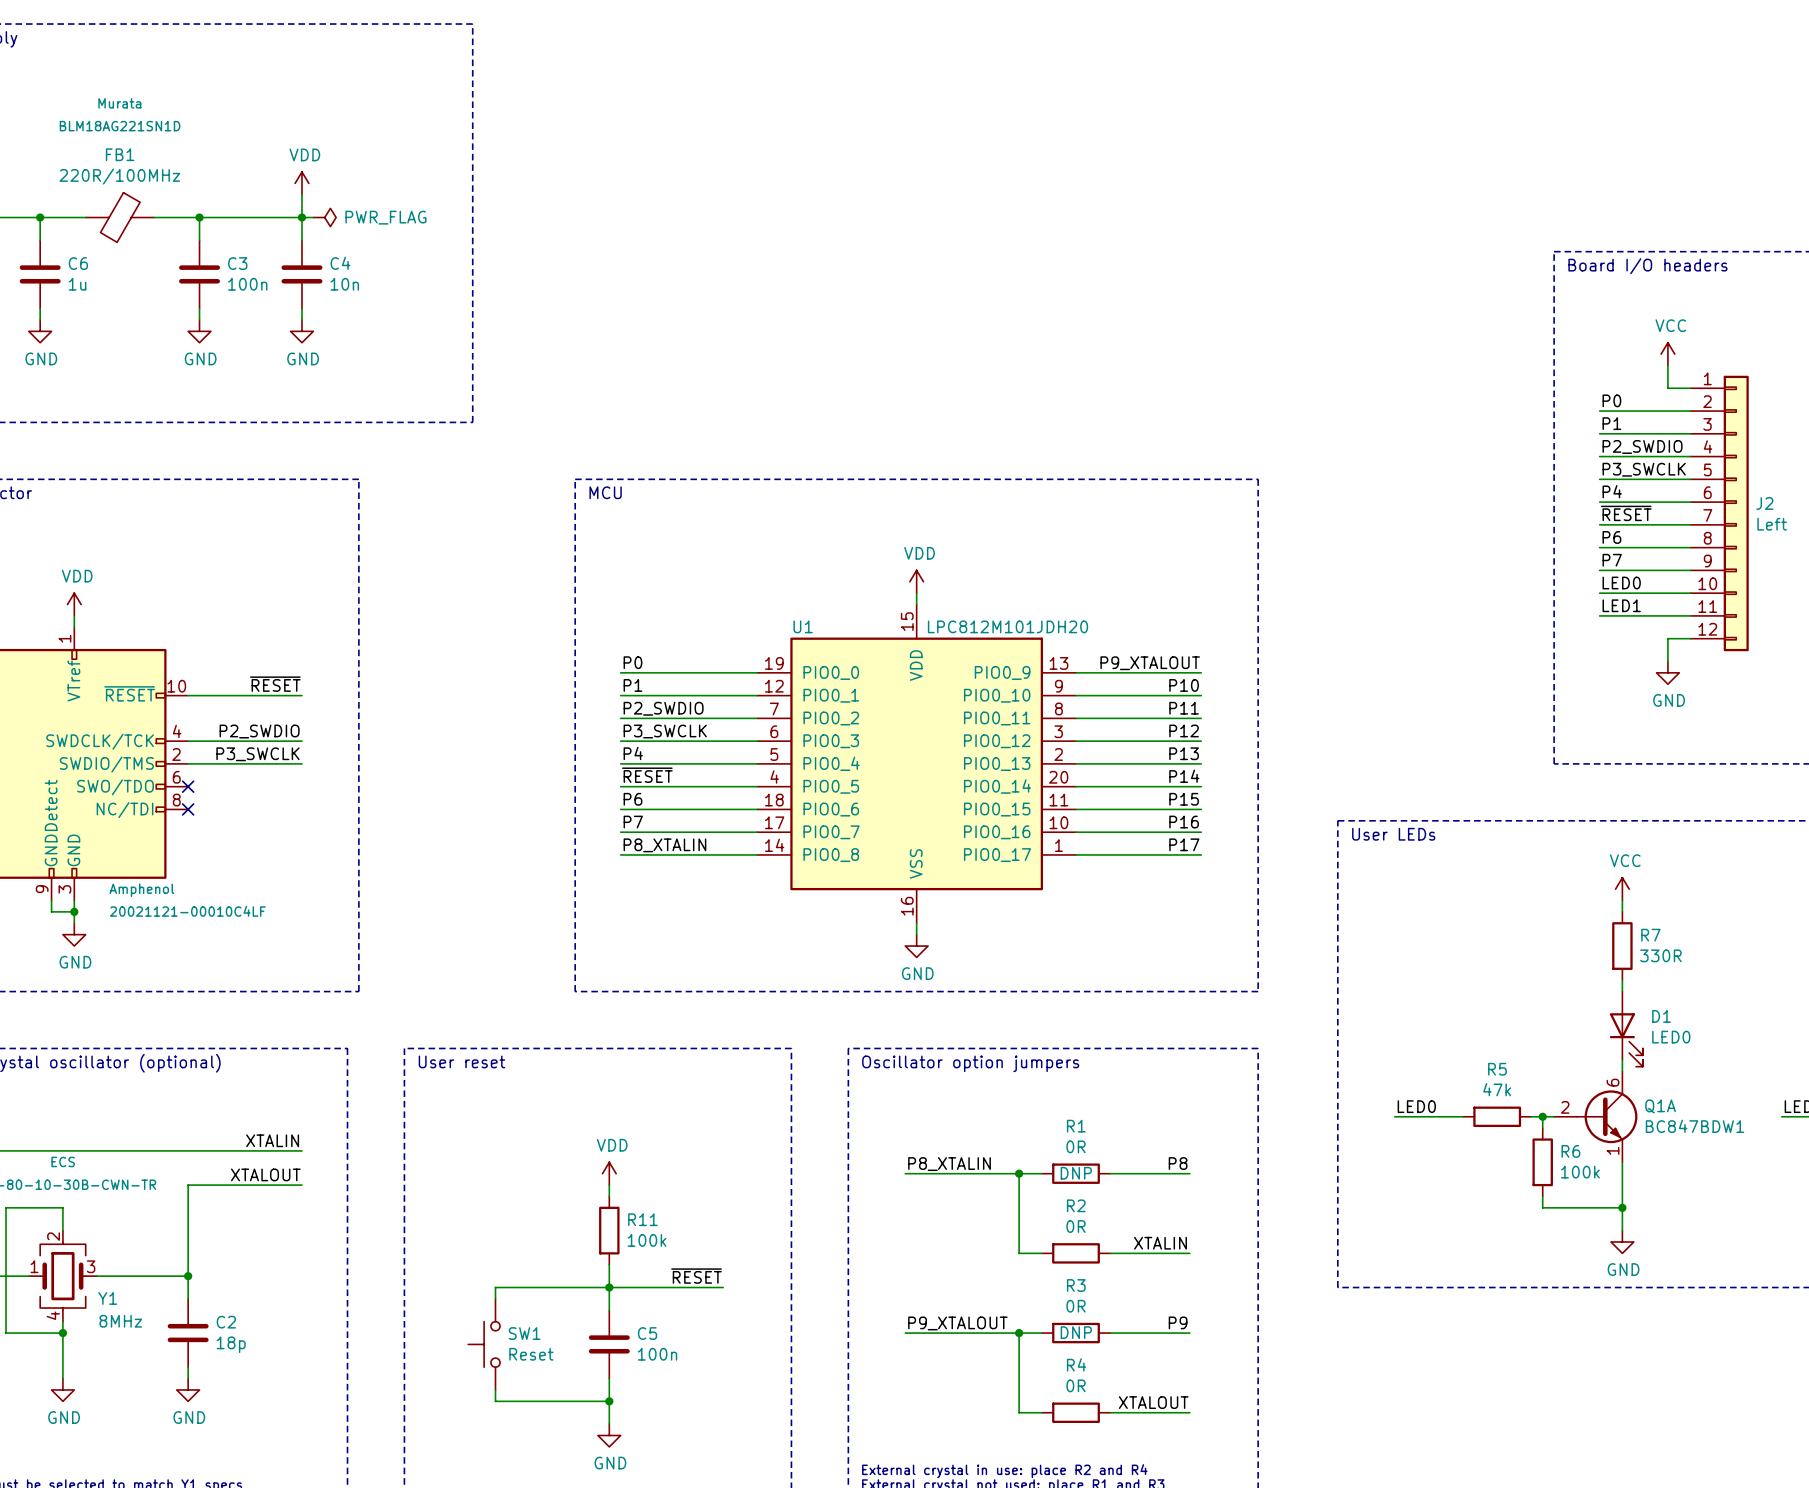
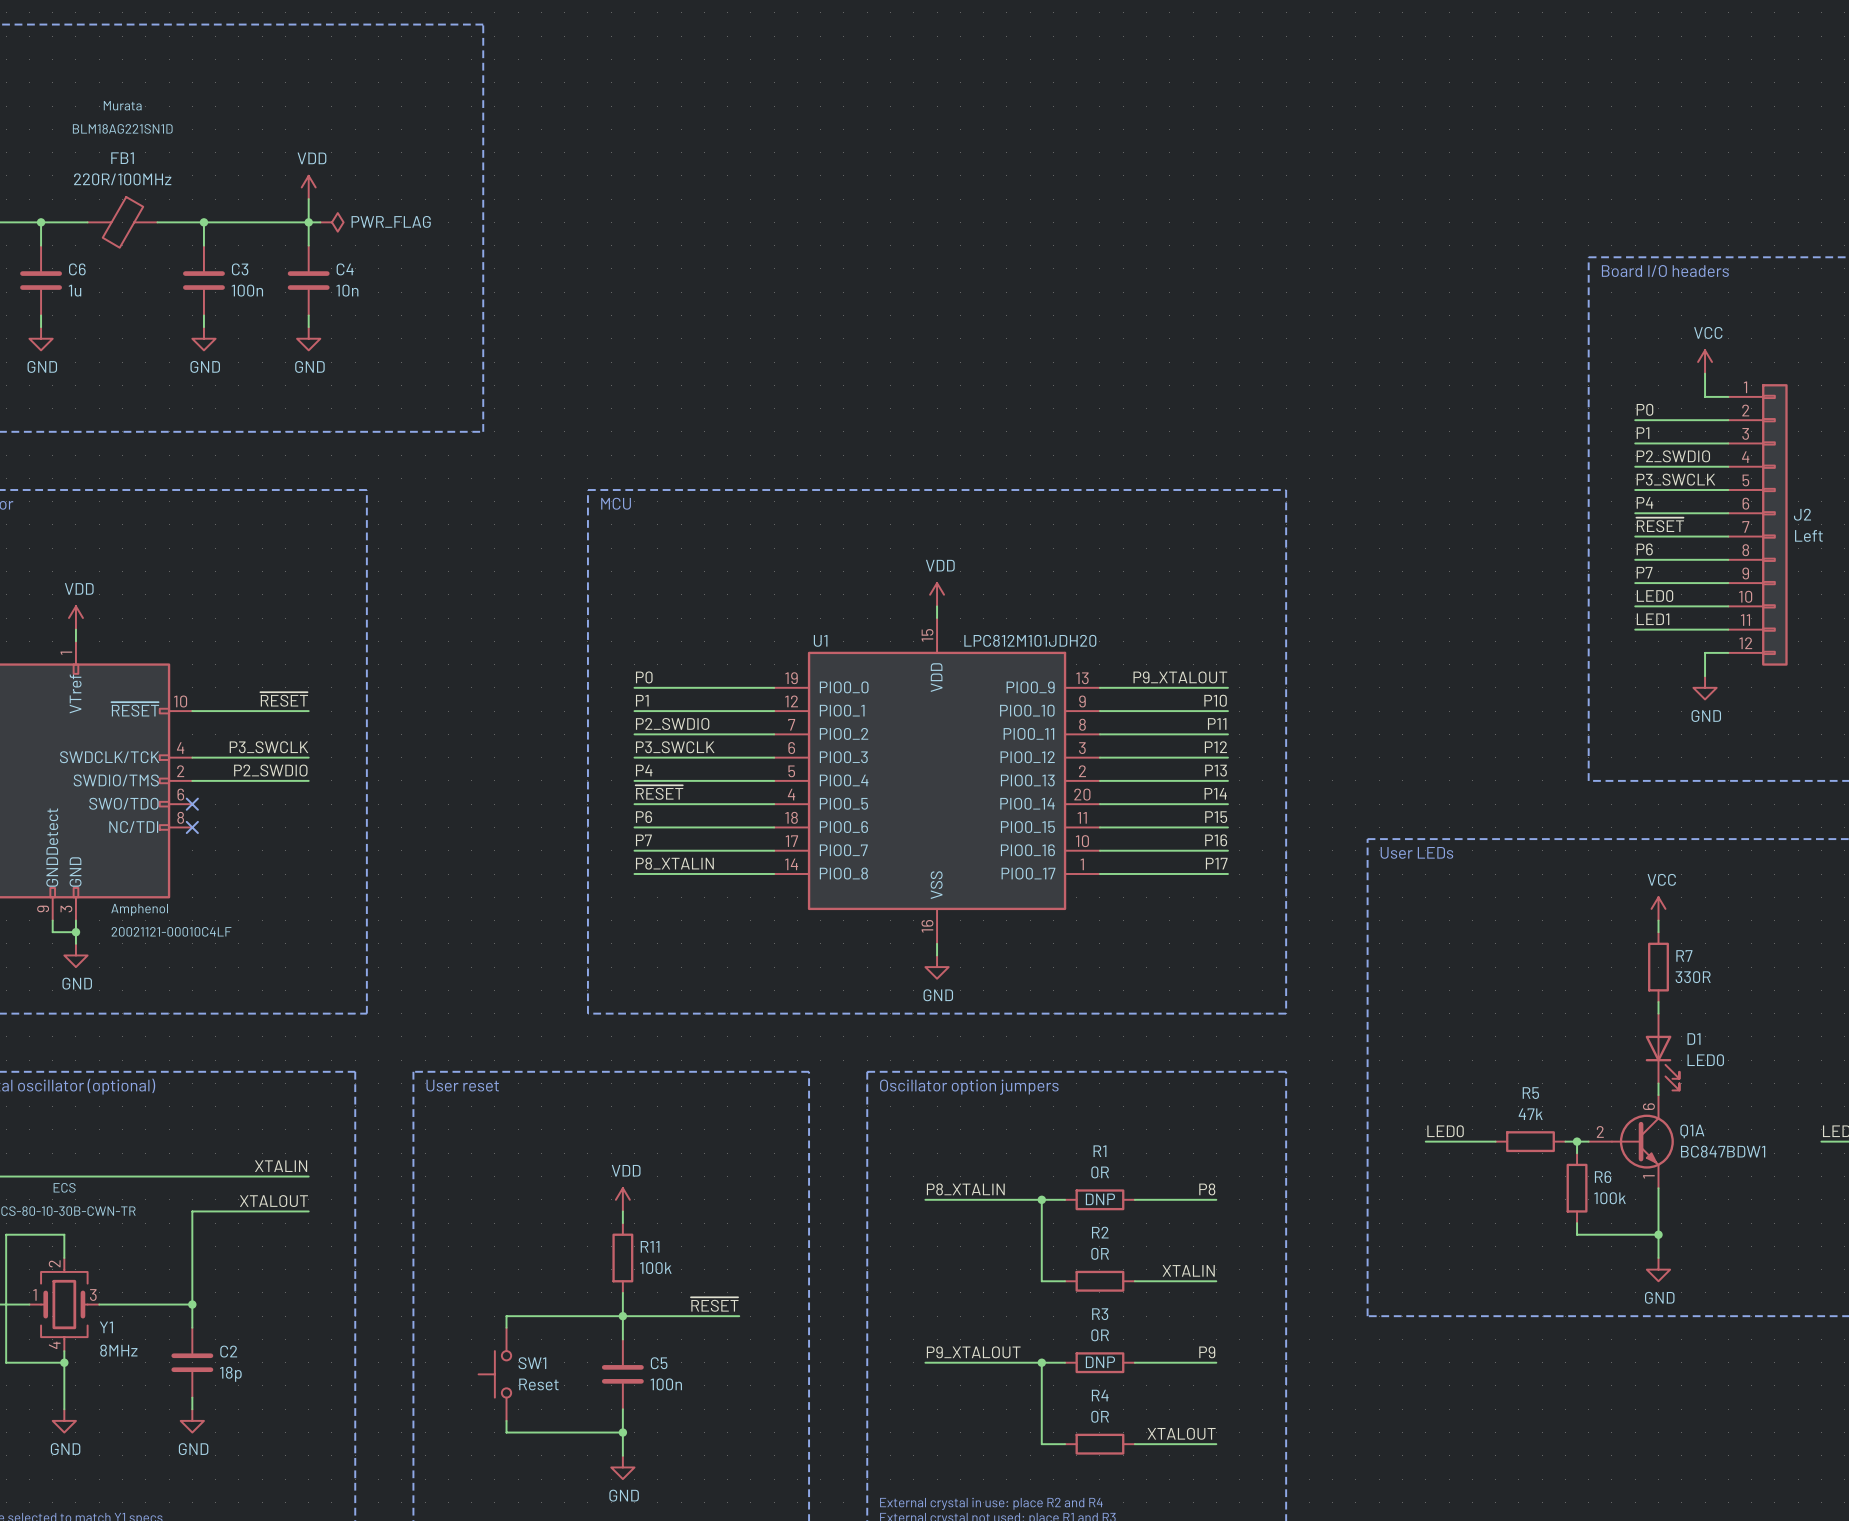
label: P2_SWDIO (259, 731) -> P3_SWCLK (268, 747)
label: P3_SWCLK (257, 754) -> P2_SWDIO (270, 770)

